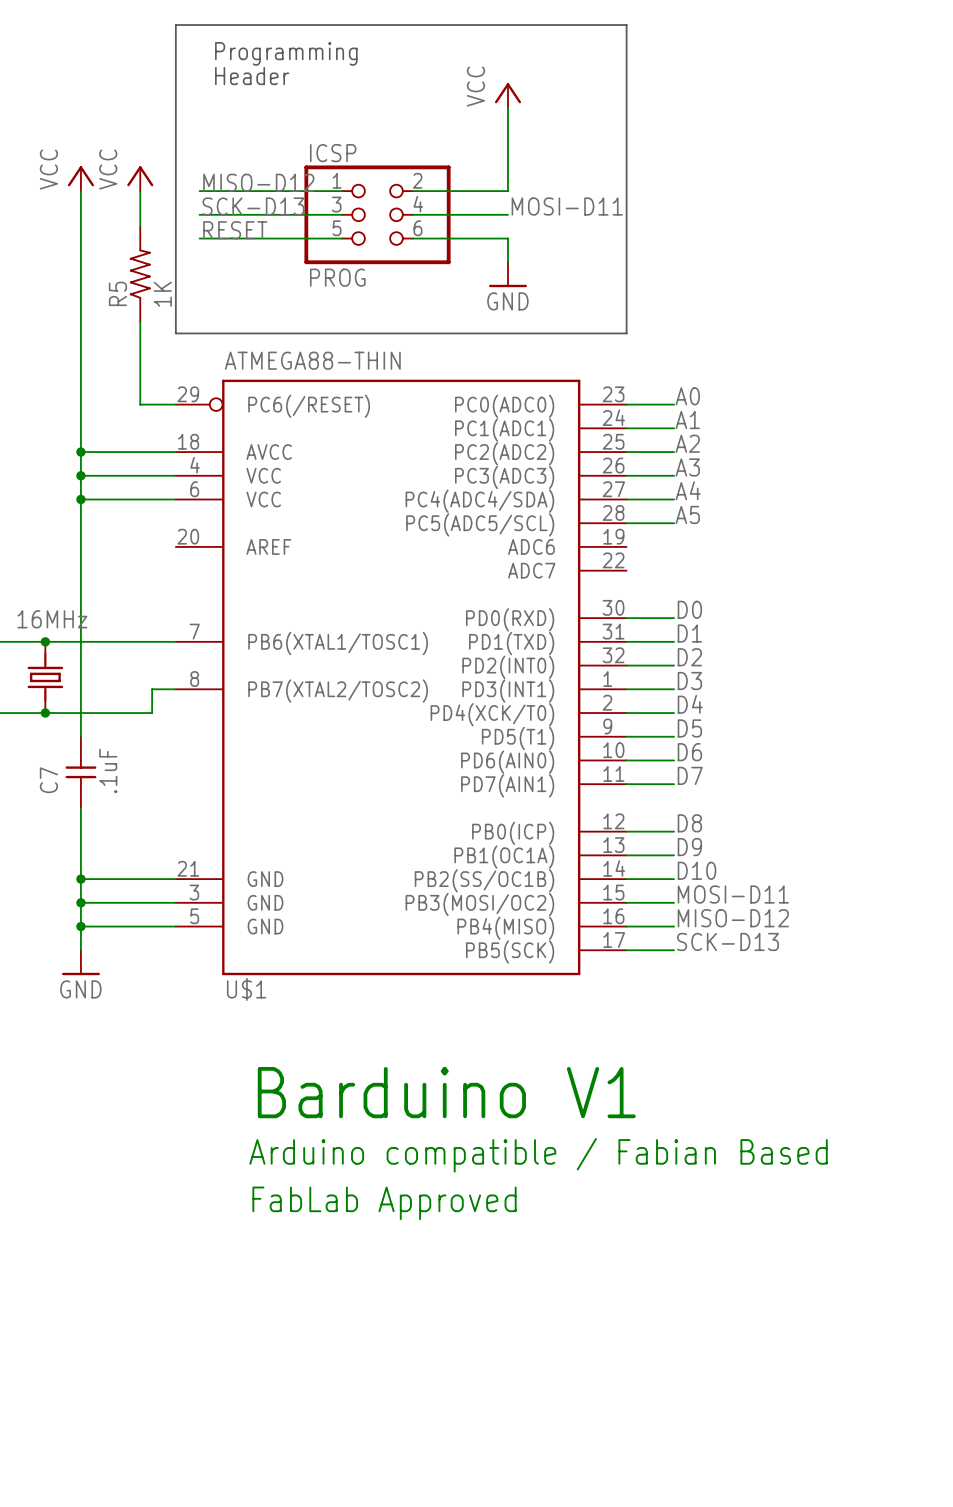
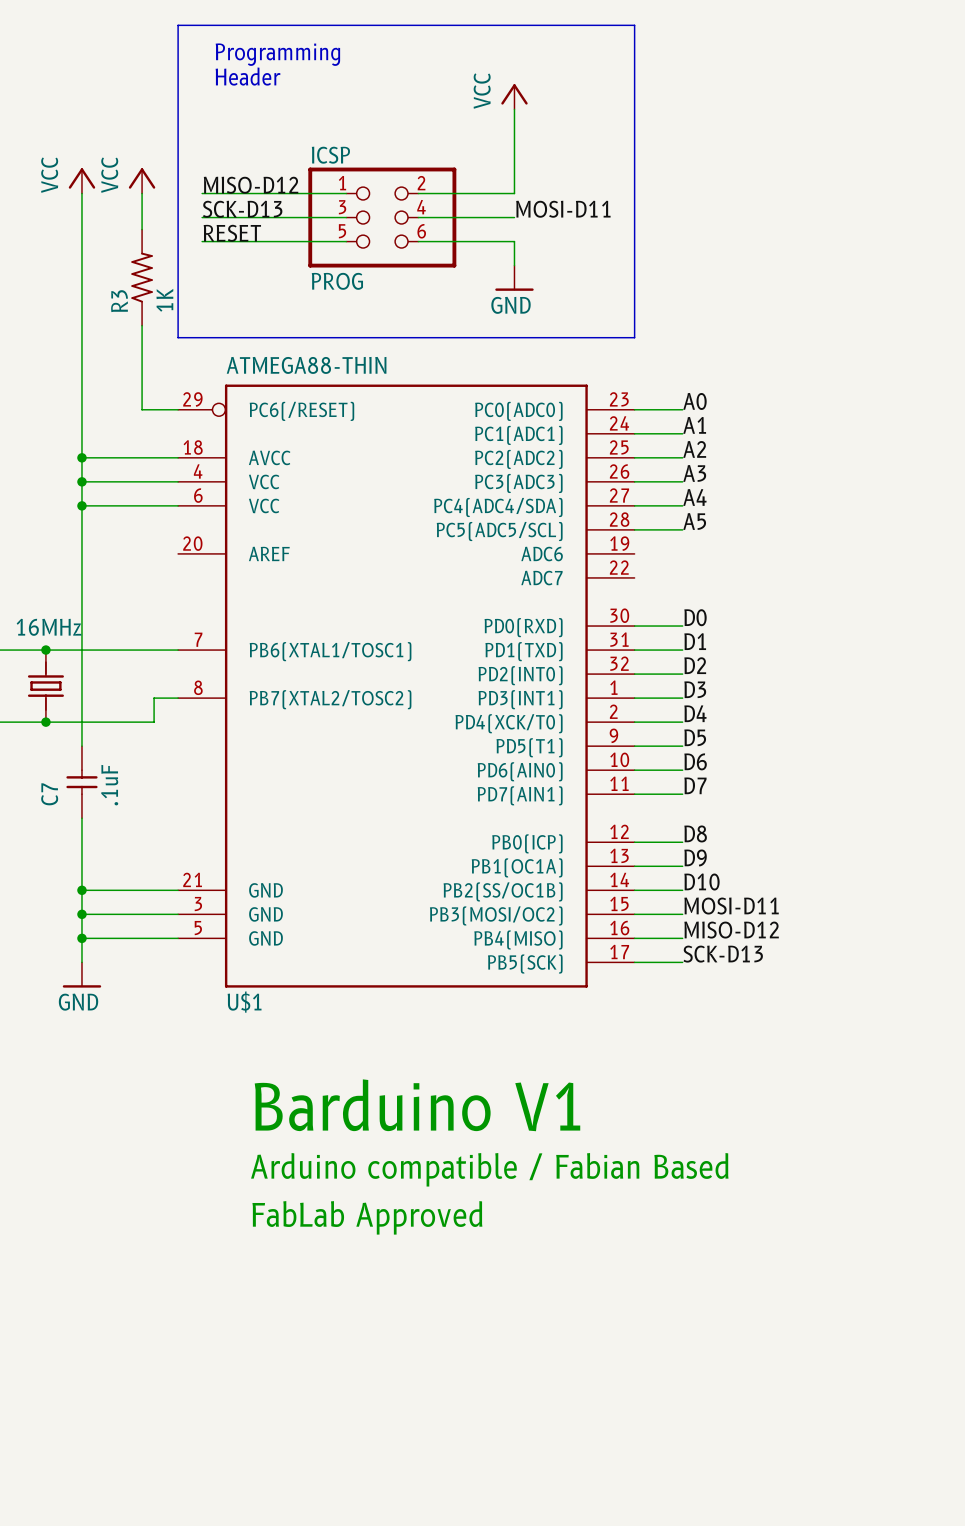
R5 name: R5 (117, 293) -> R3 (119, 301)

